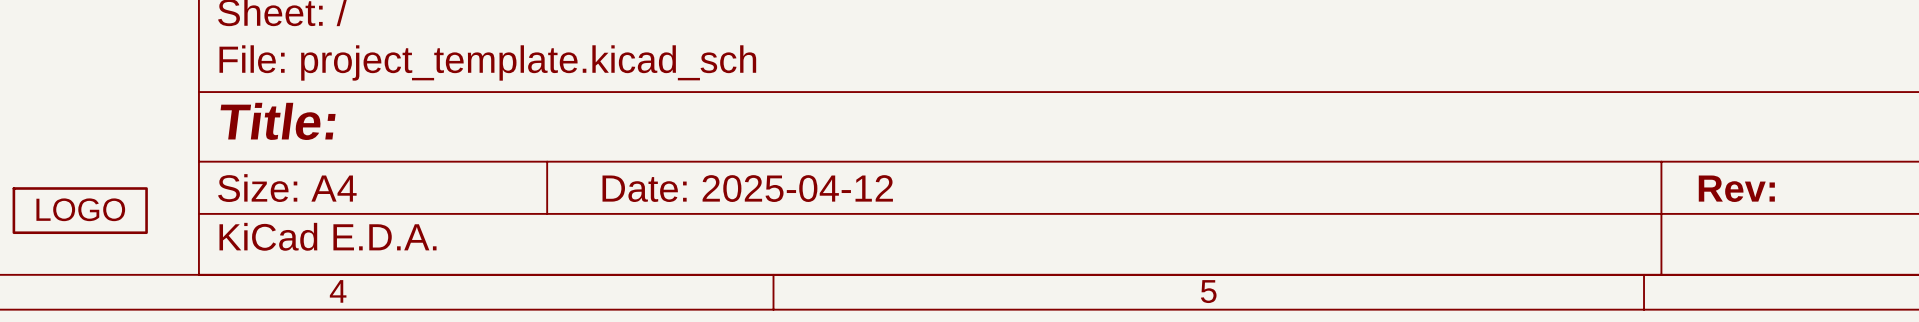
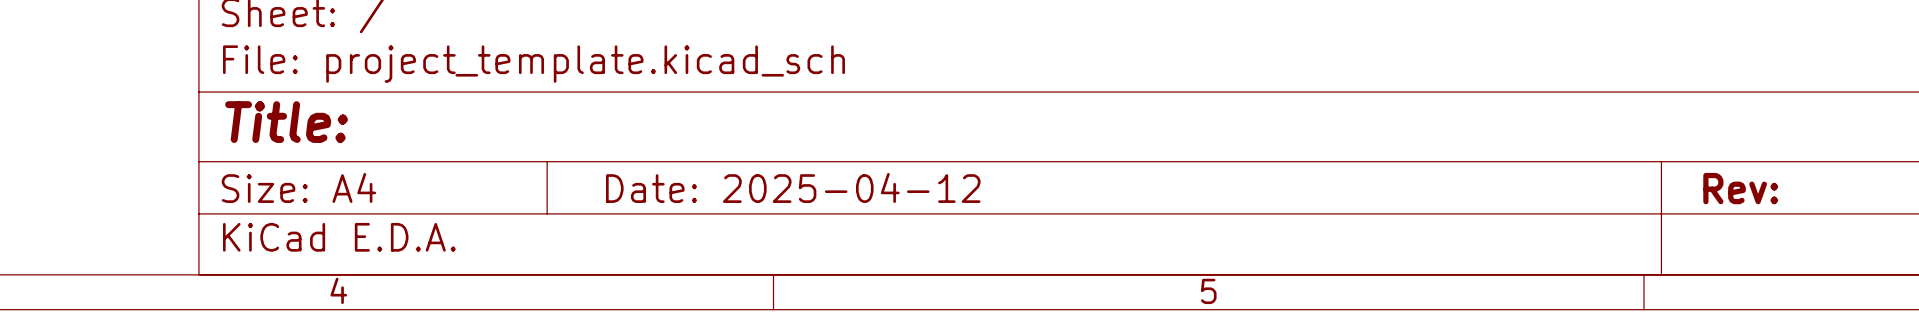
part: (80, 210) -> none

